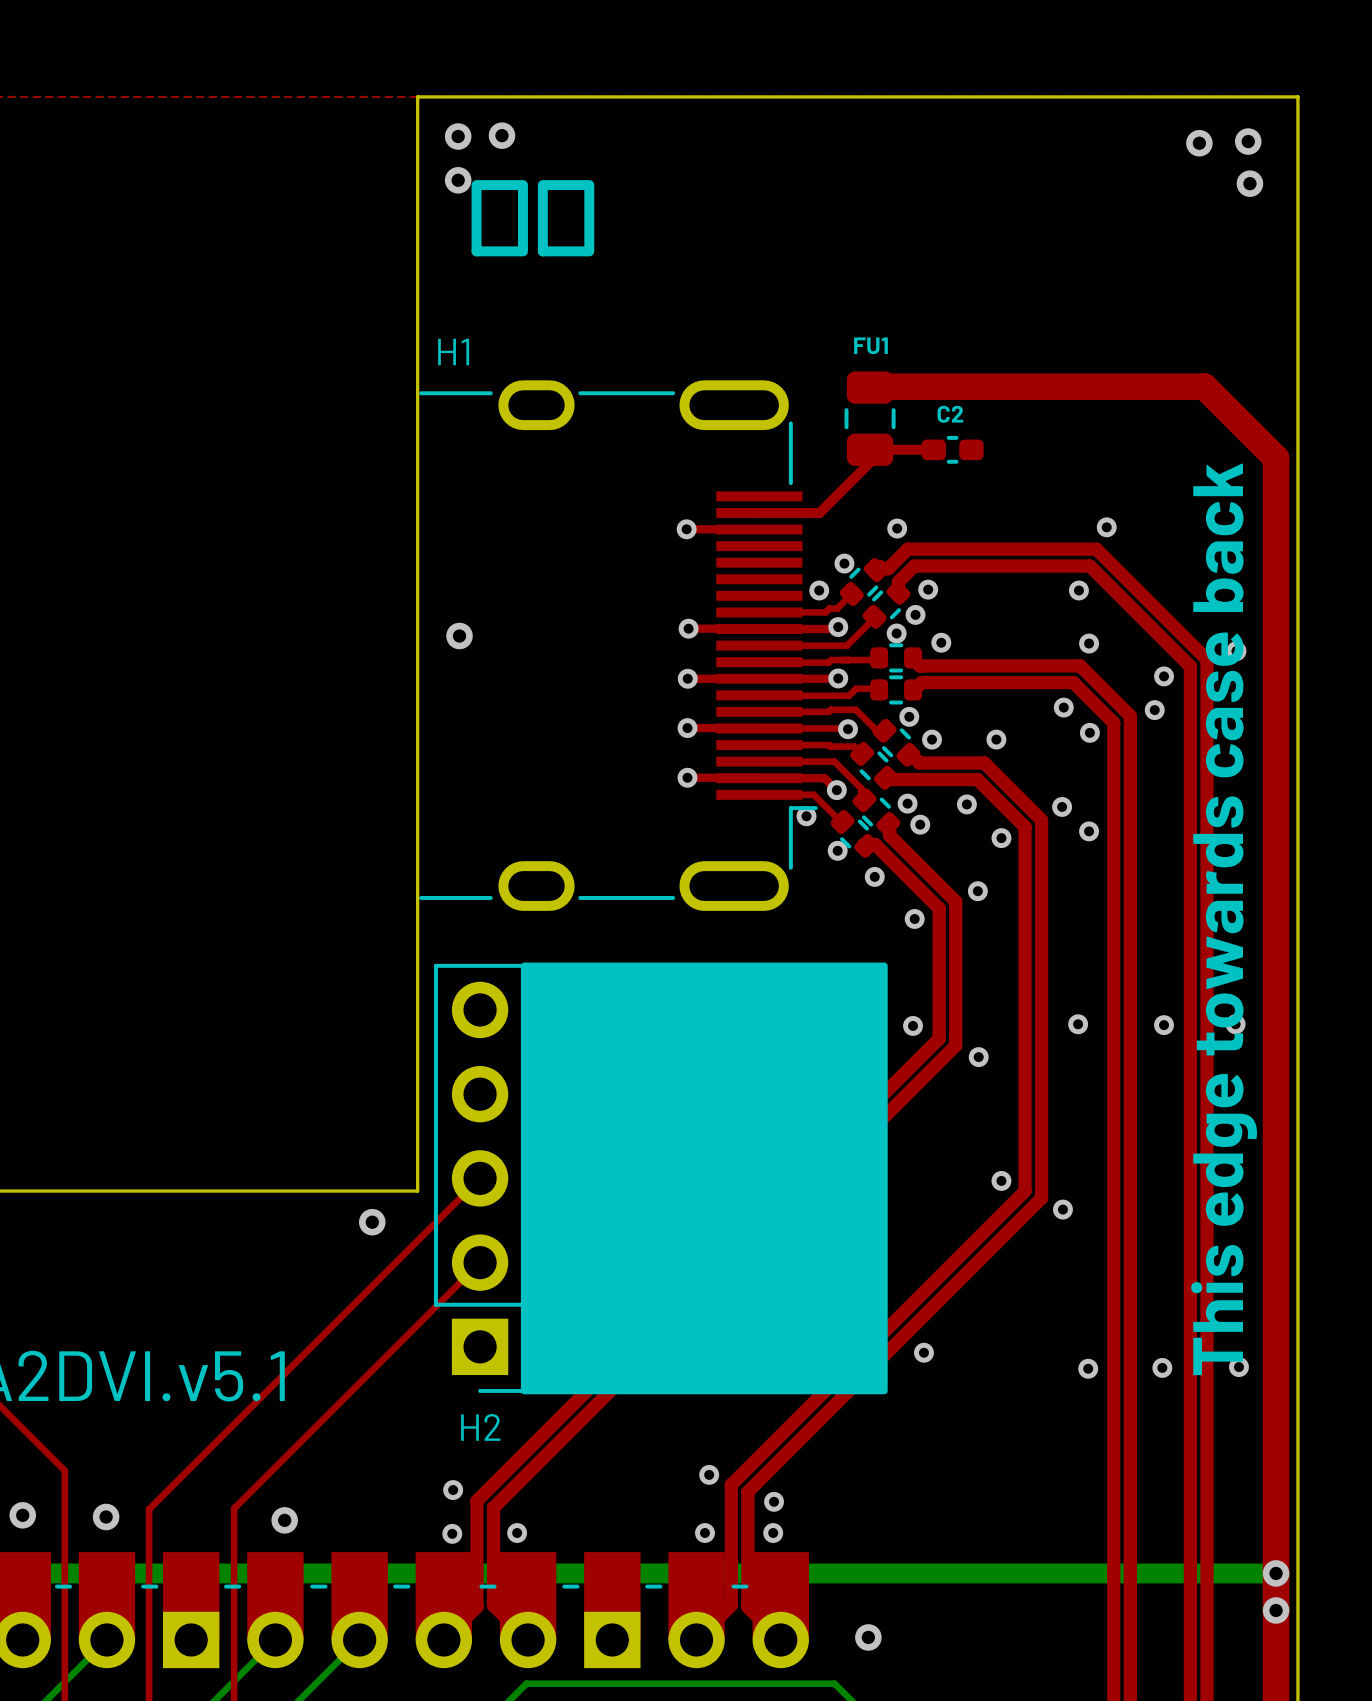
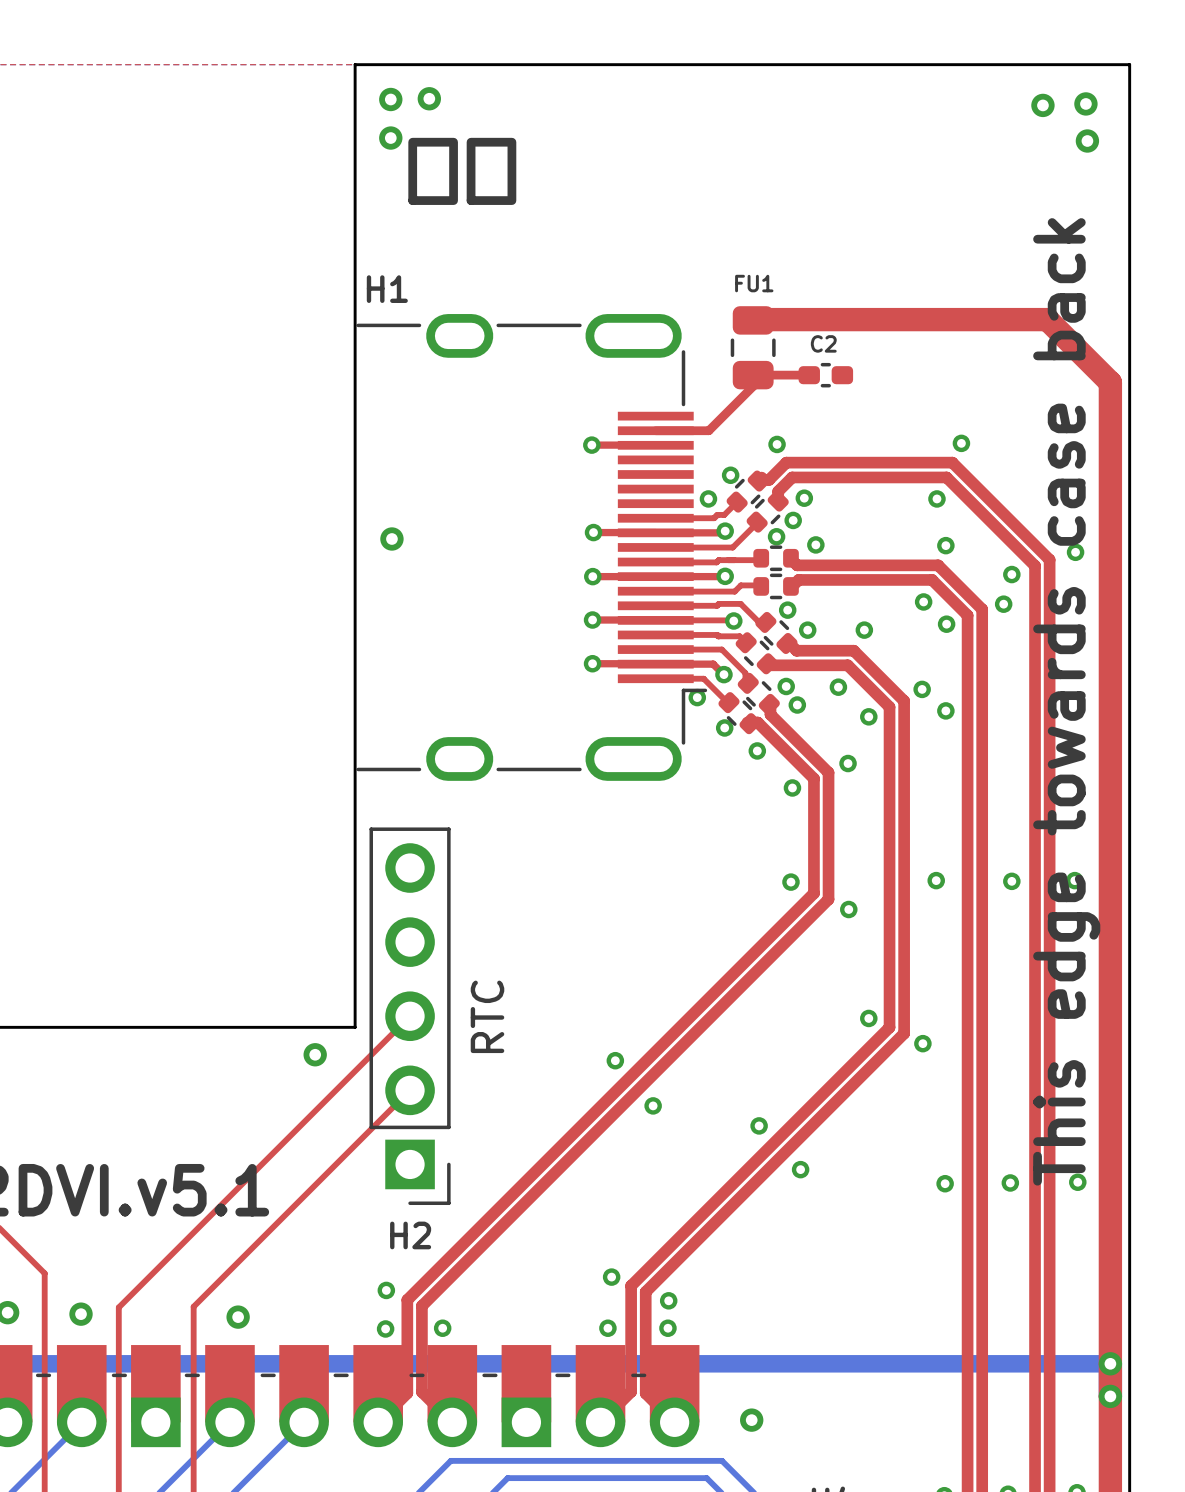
drawing: [520, 962, 888, 1395] -> none

